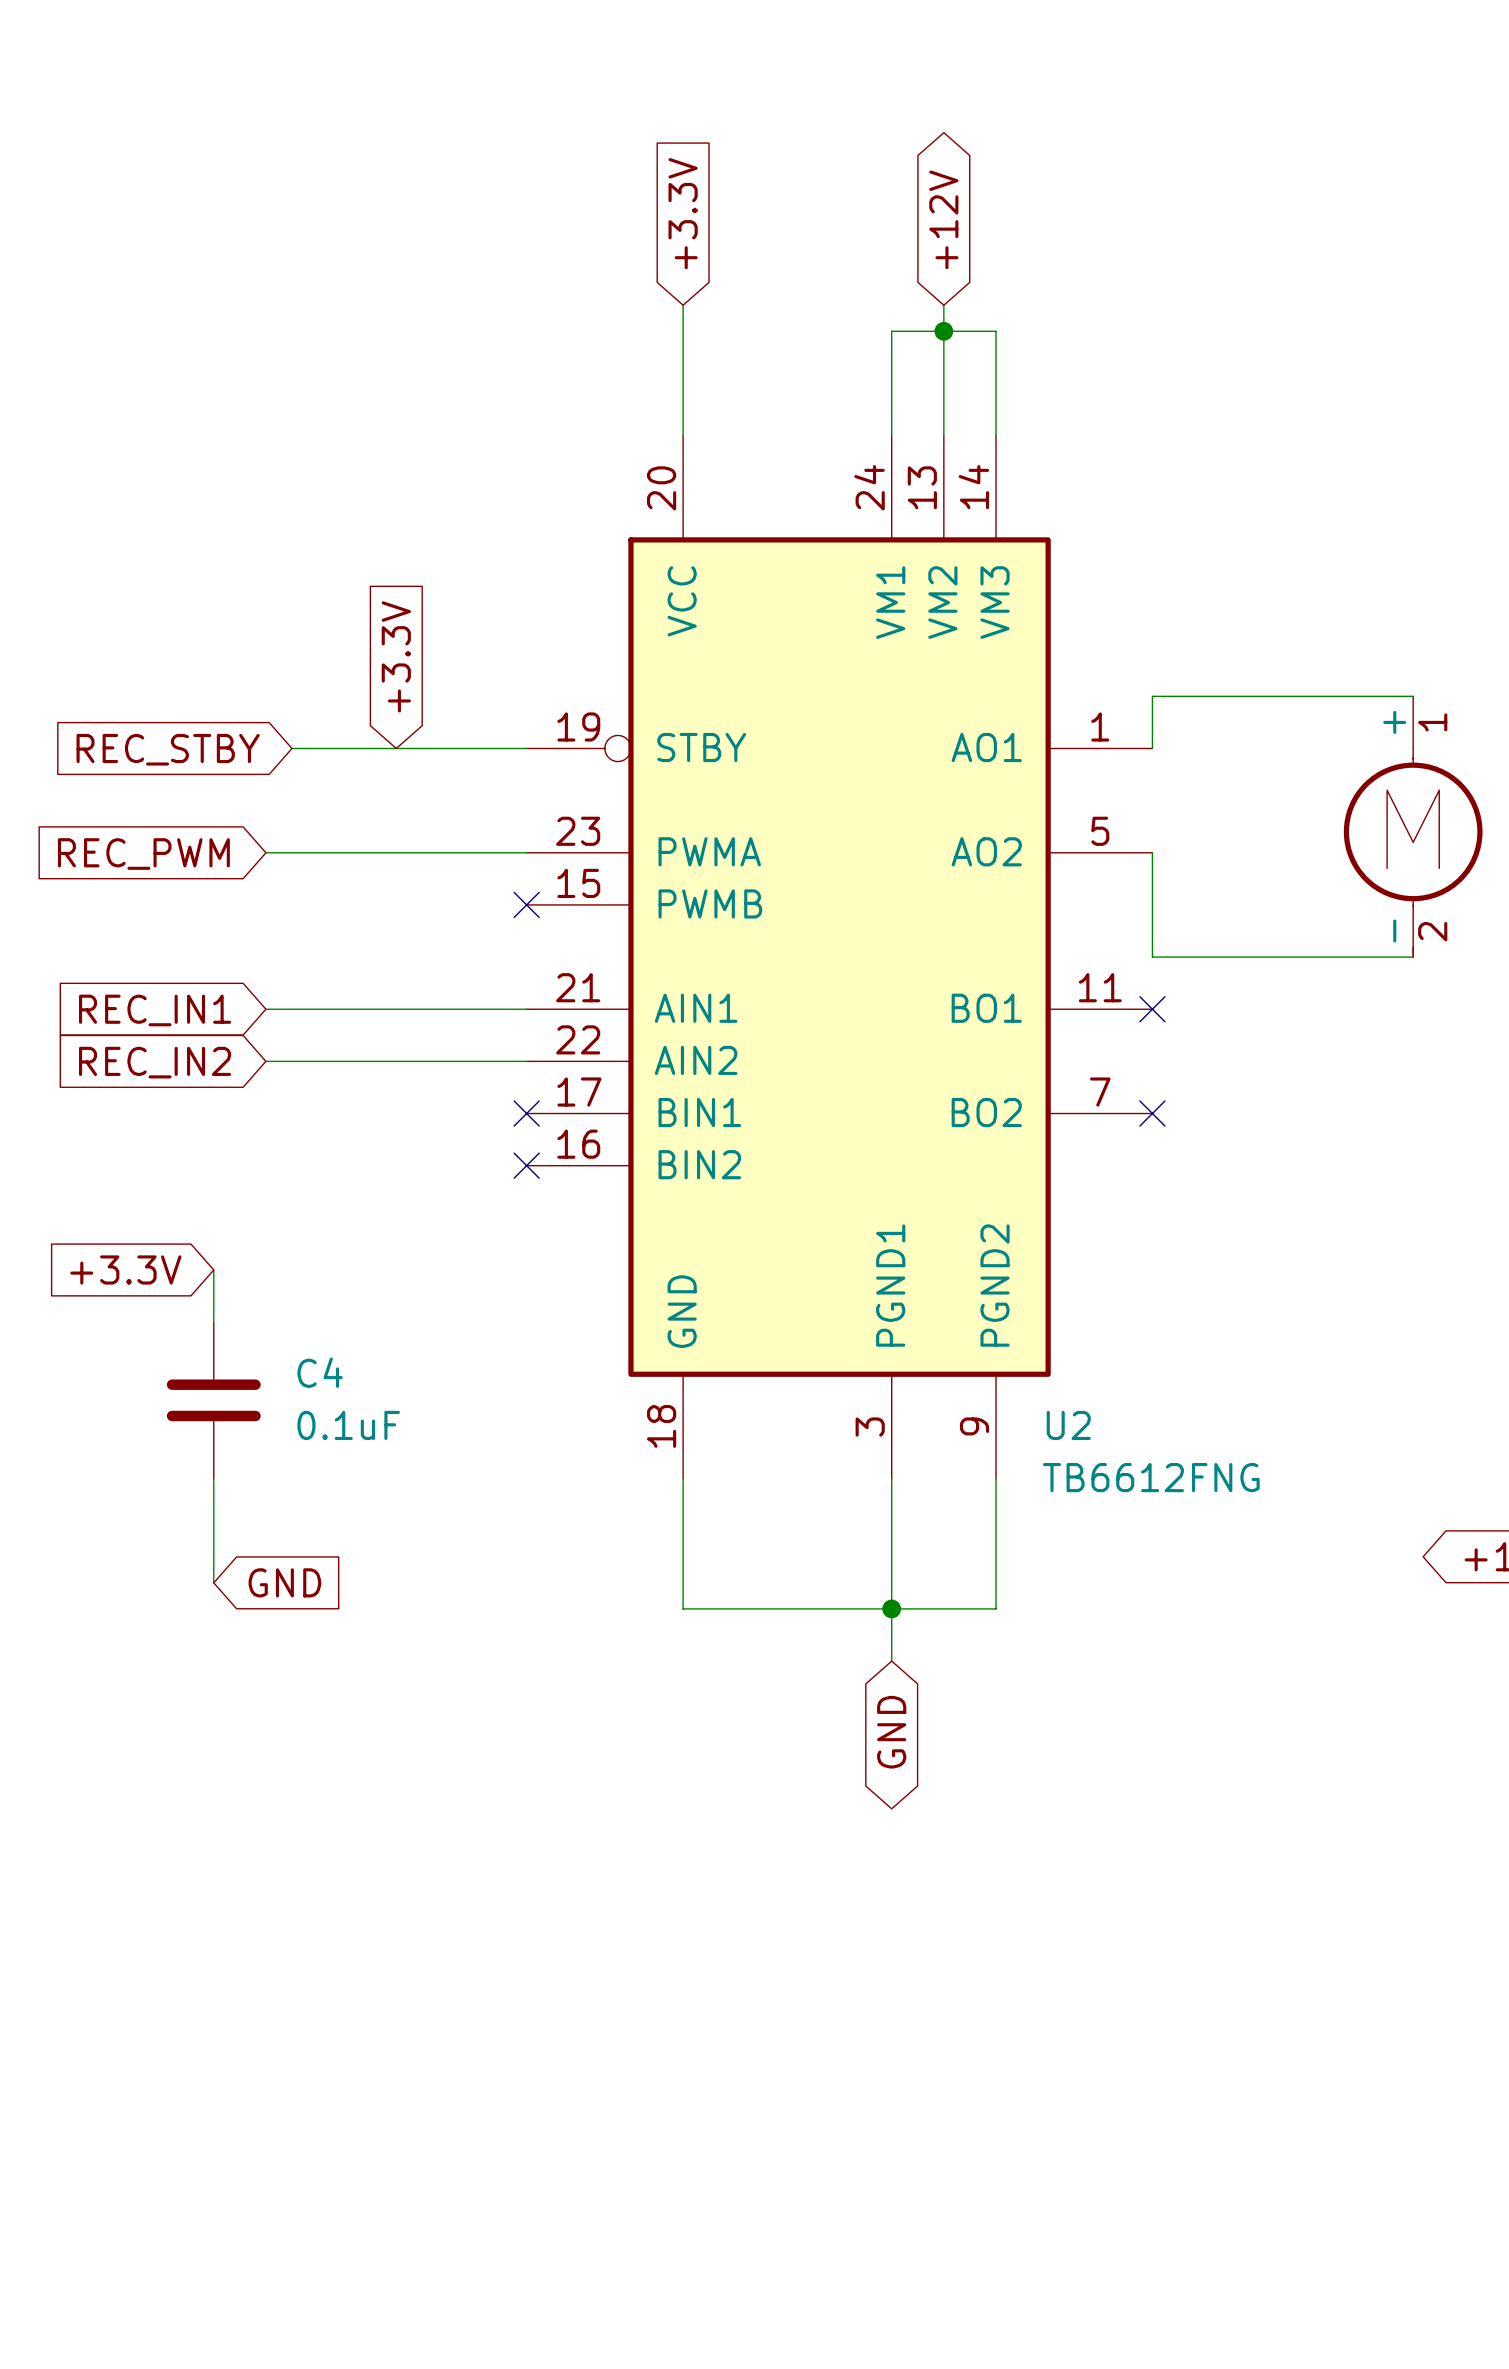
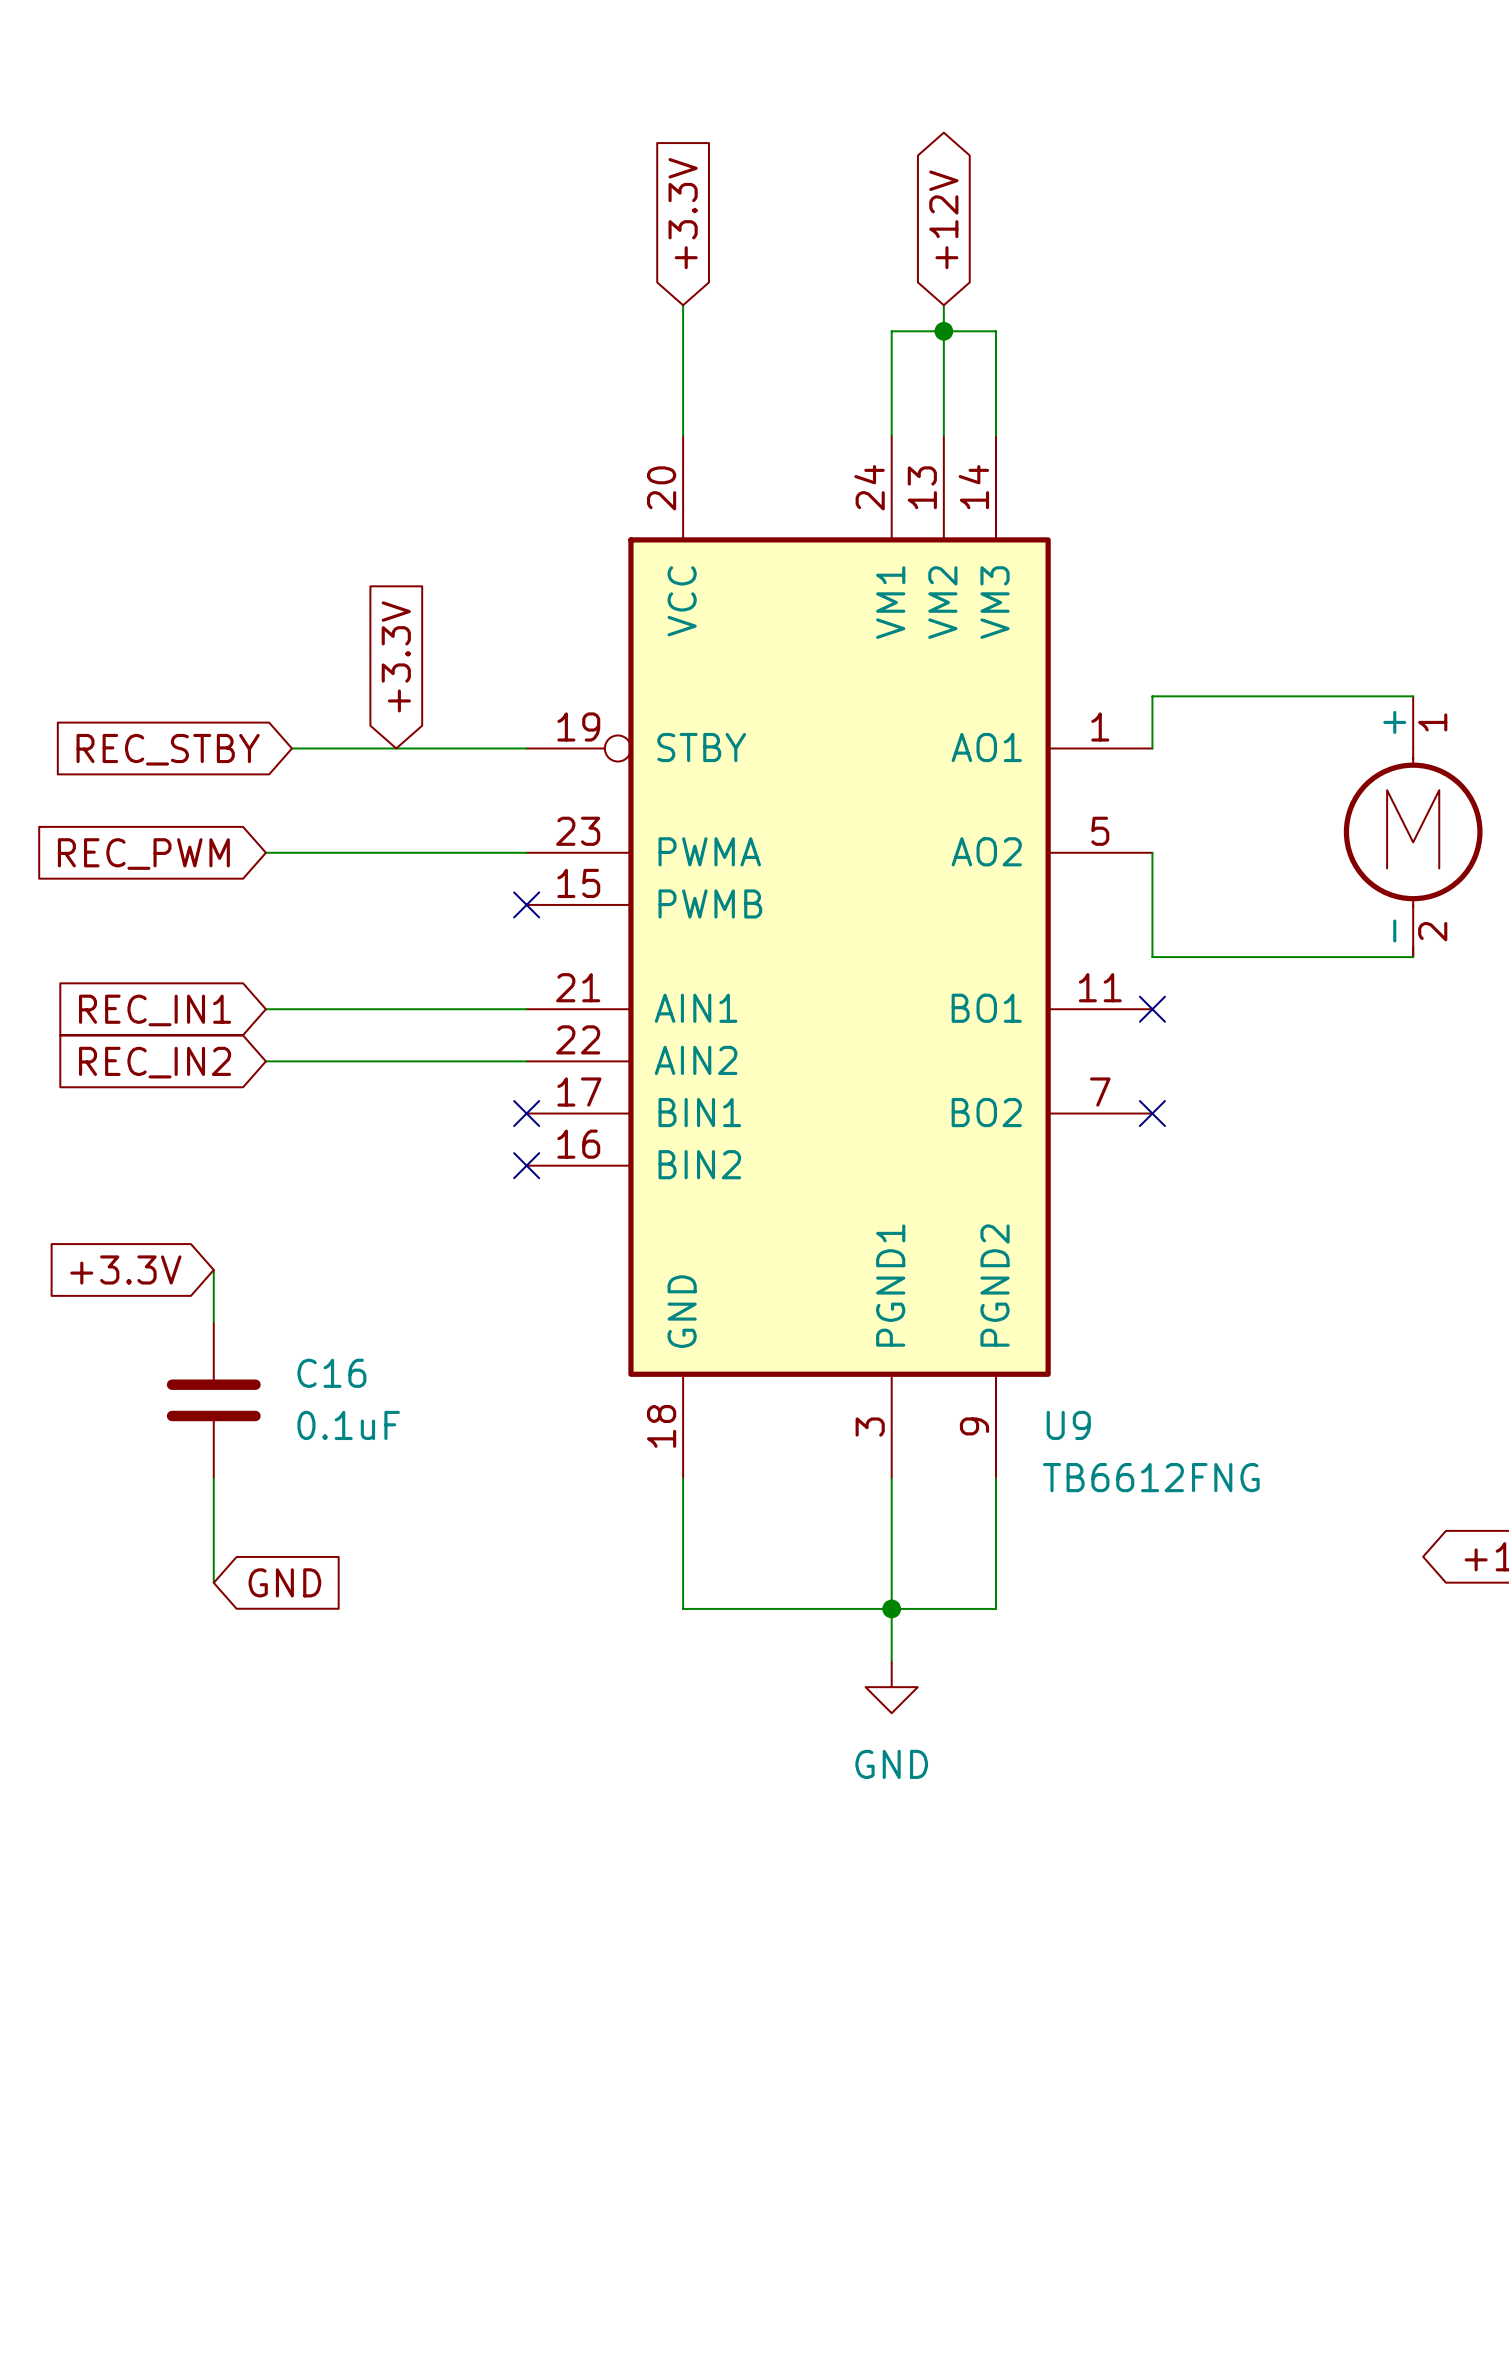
C4 name: C4 (320, 1372) -> C16 (331, 1373)
U2 name: U2 (1068, 1425) -> U9 (1068, 1425)
power symbol: none -> GND (891, 1687)
global label: GND (891, 1732) -> none

